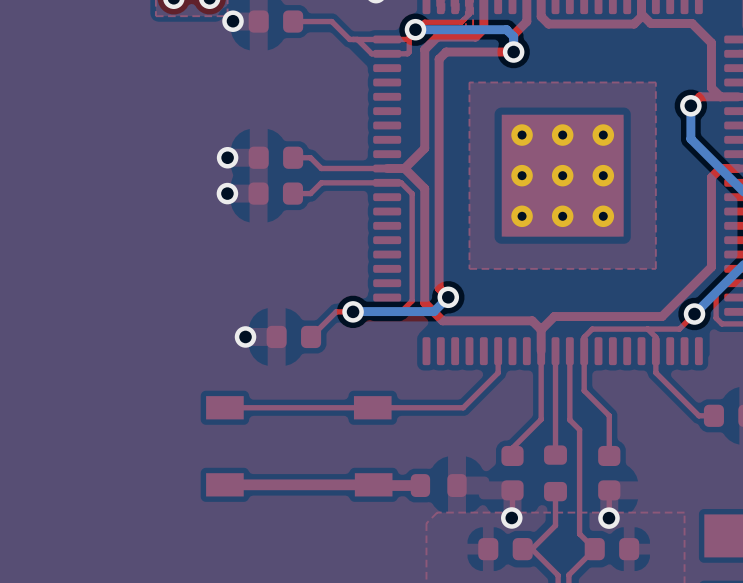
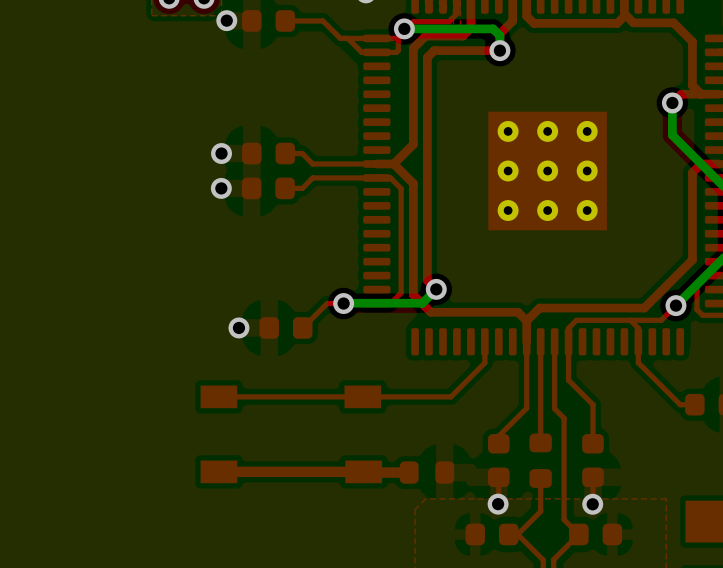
top zone outline: (655, 82) (655, 268) (469, 268) (469, 82) (655, 82) -> none

